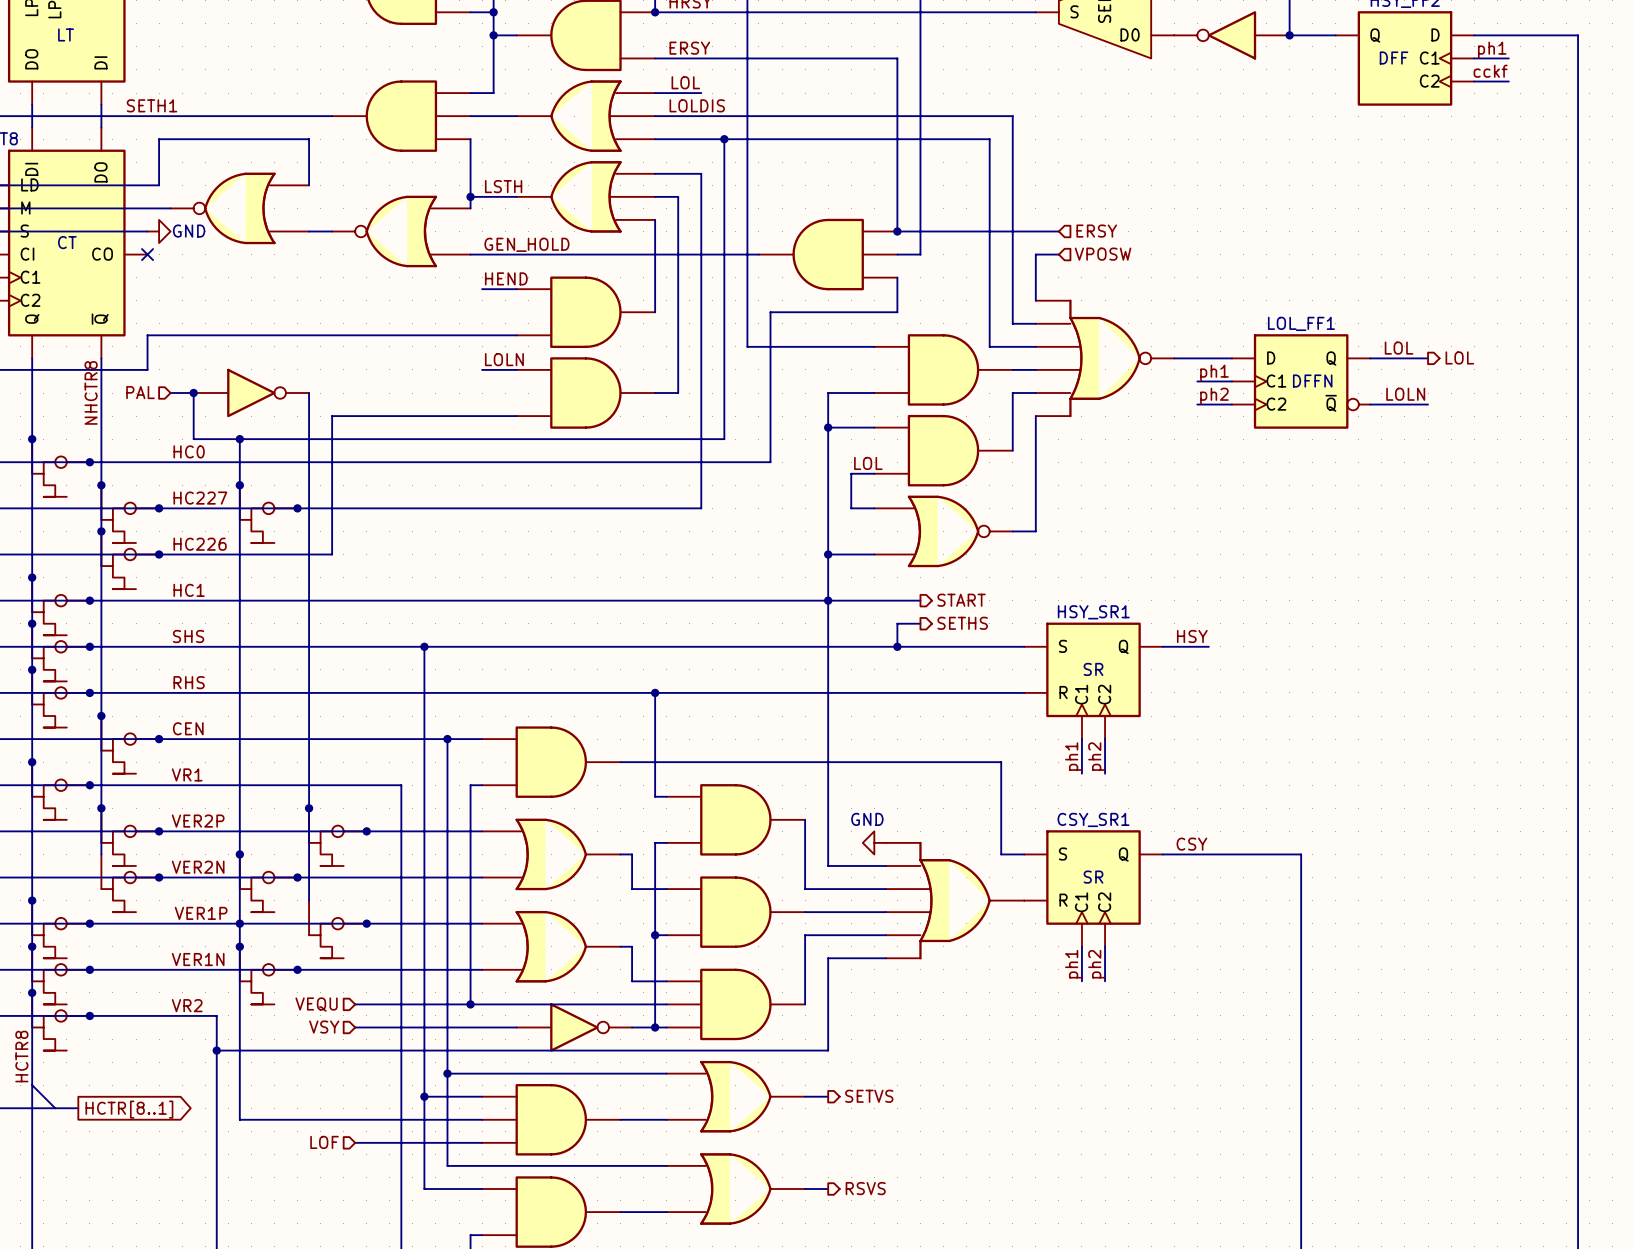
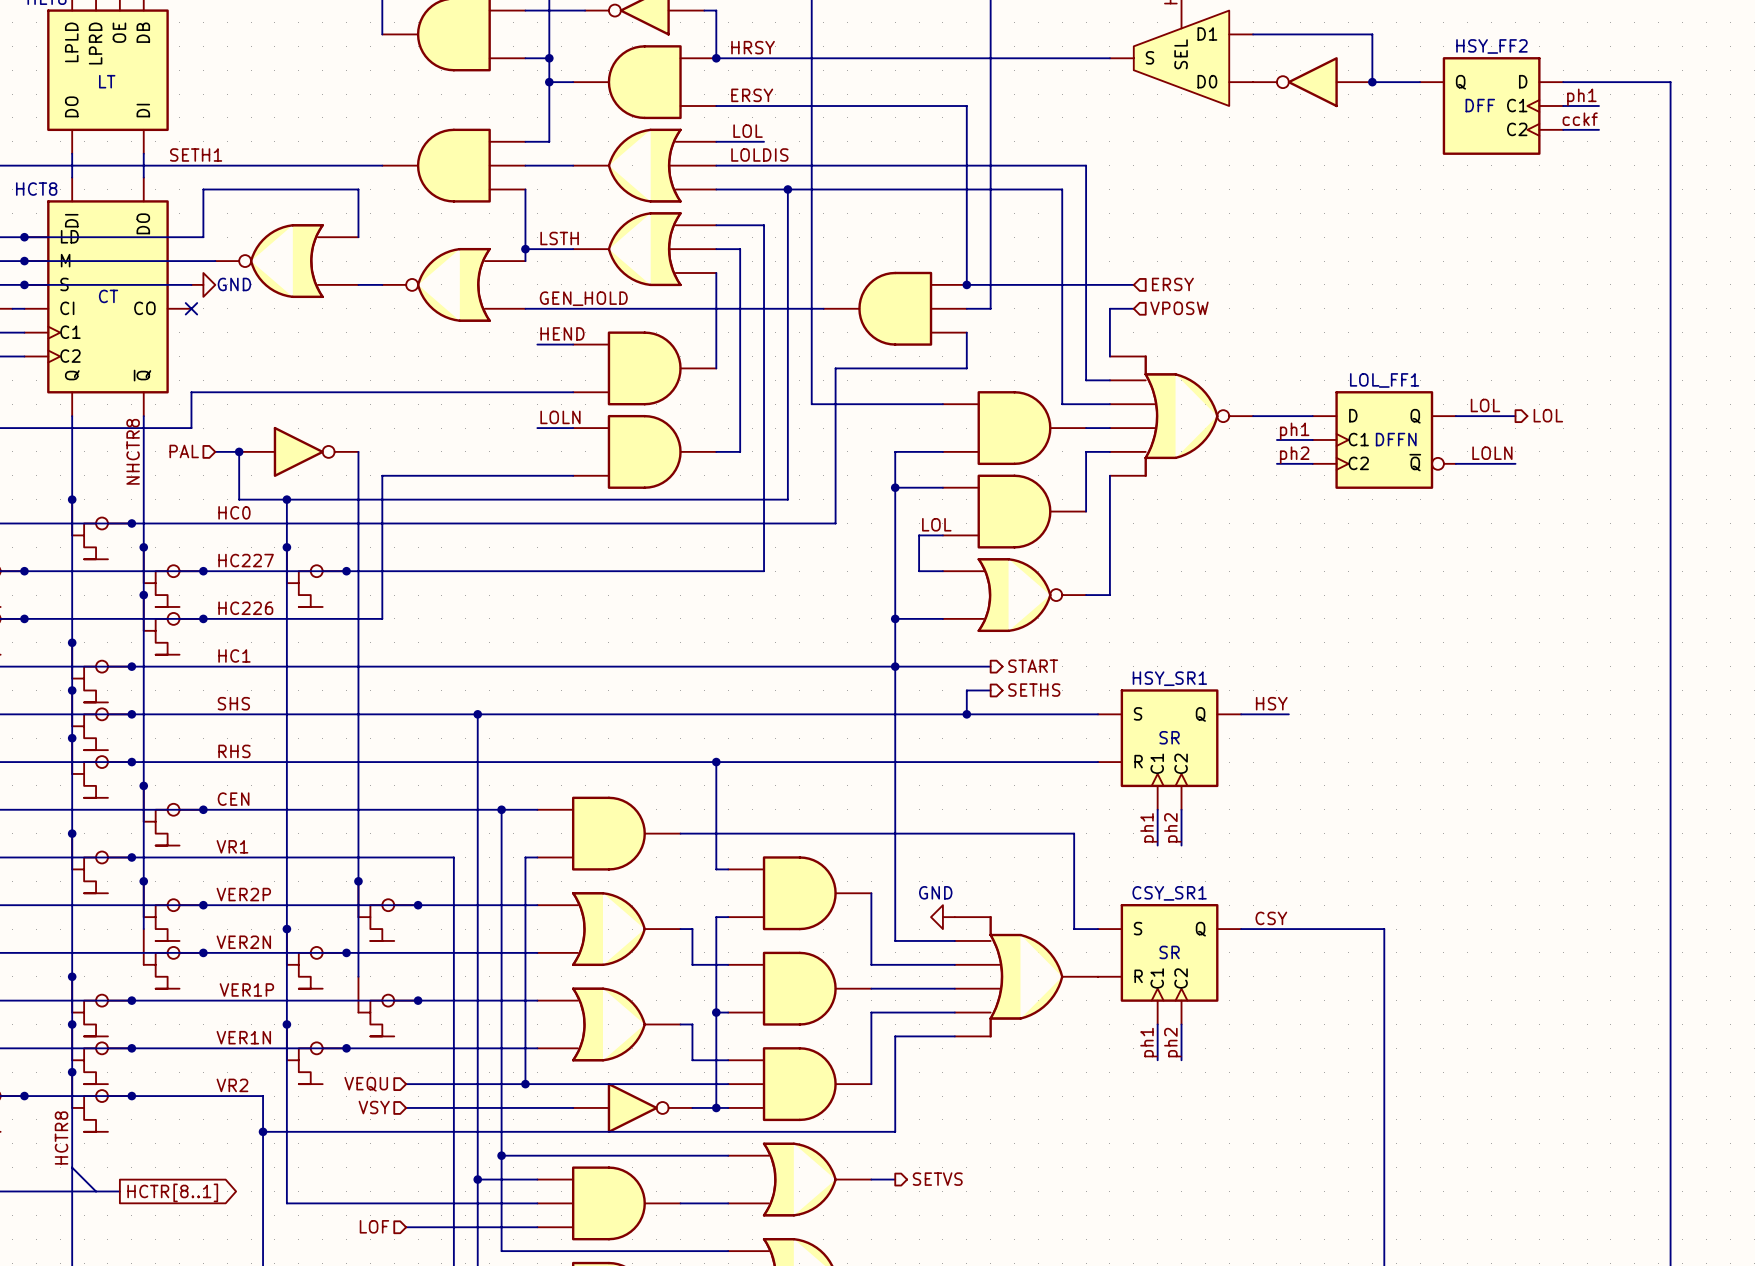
junction: (239, 923) -> none

